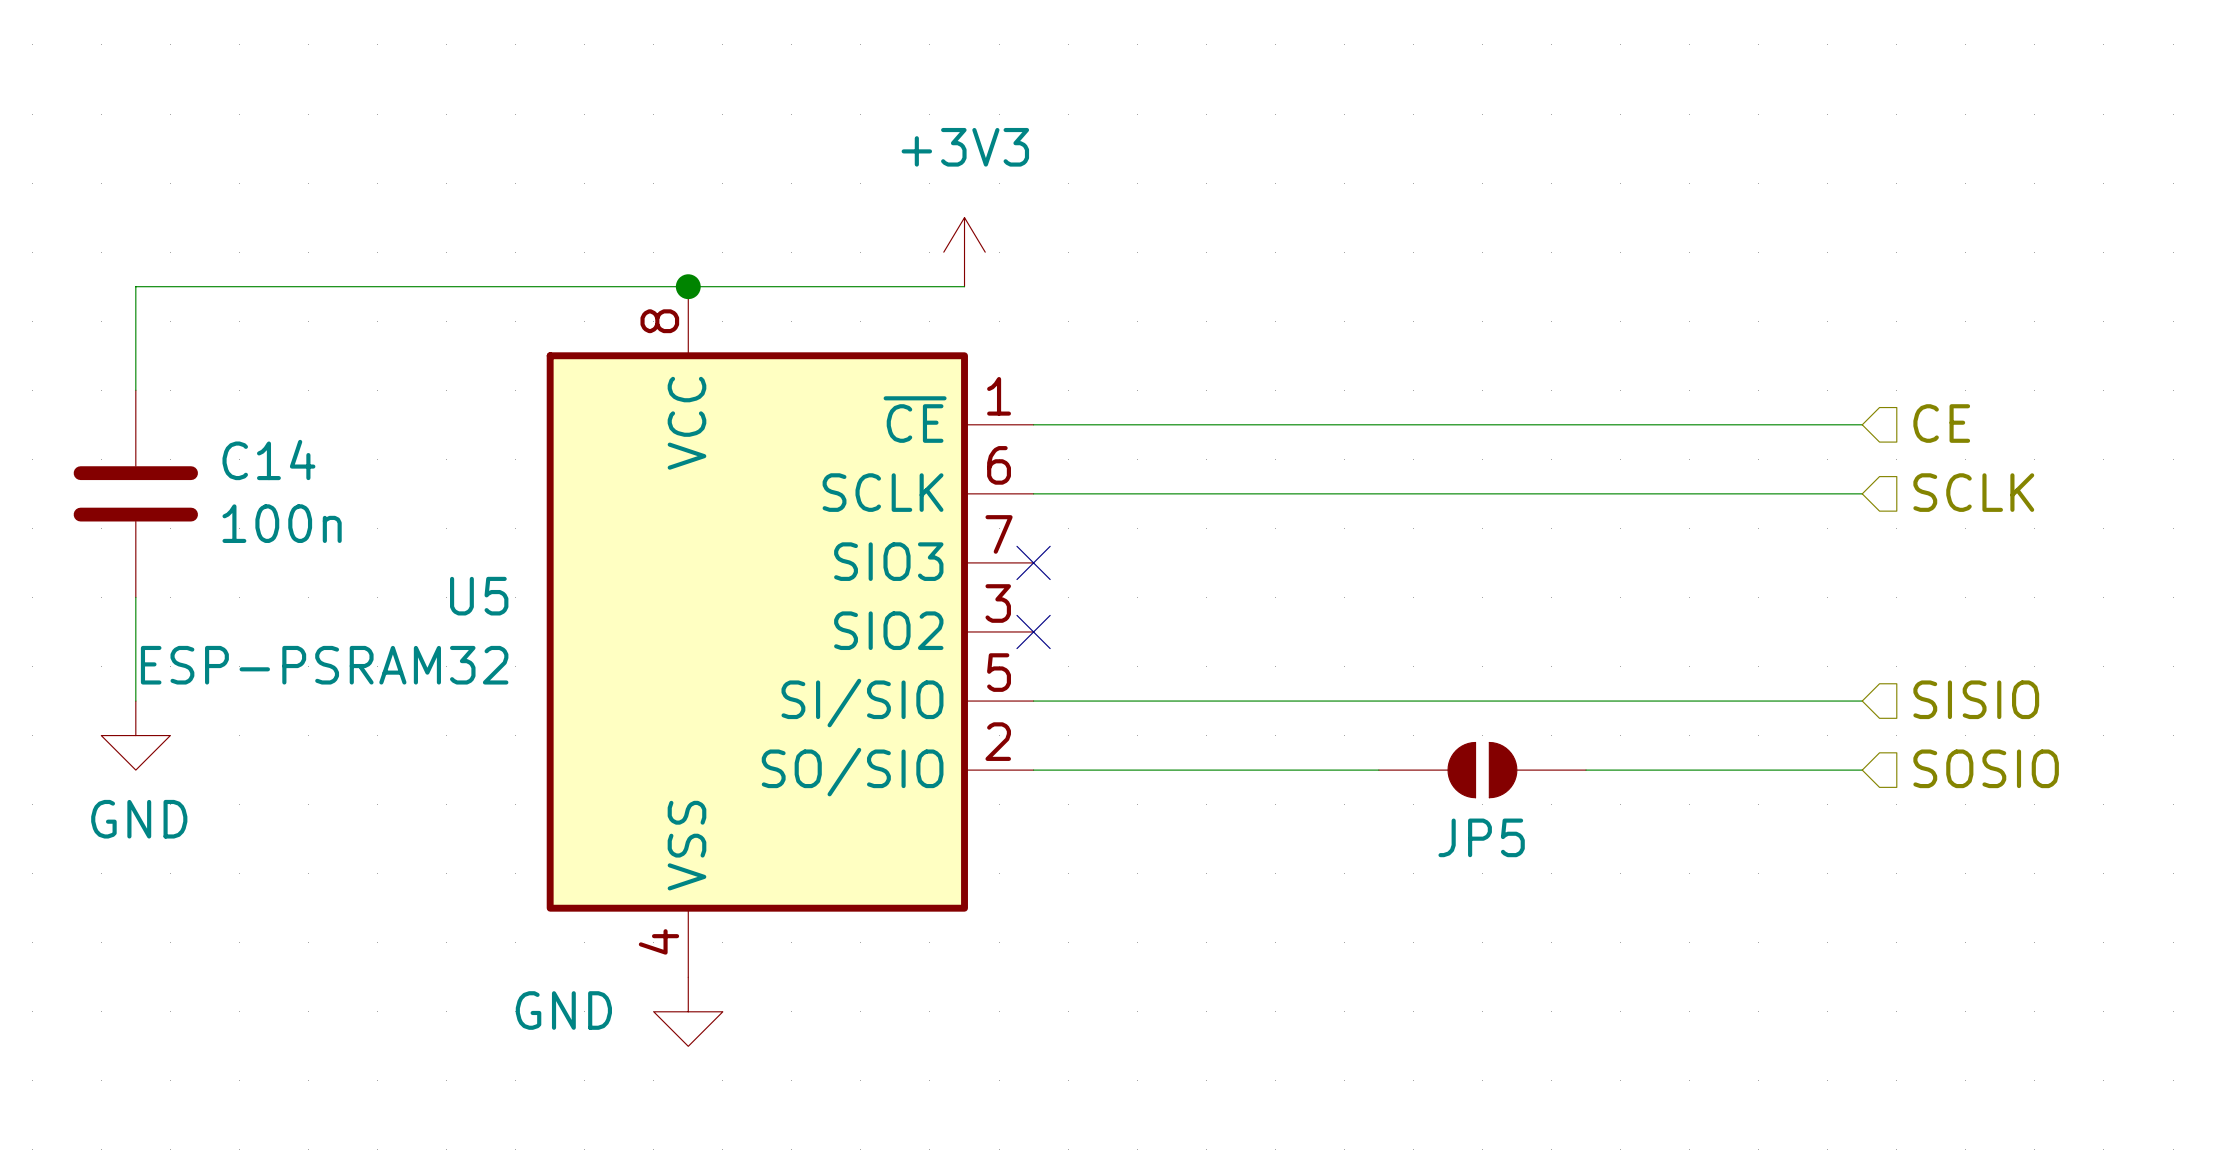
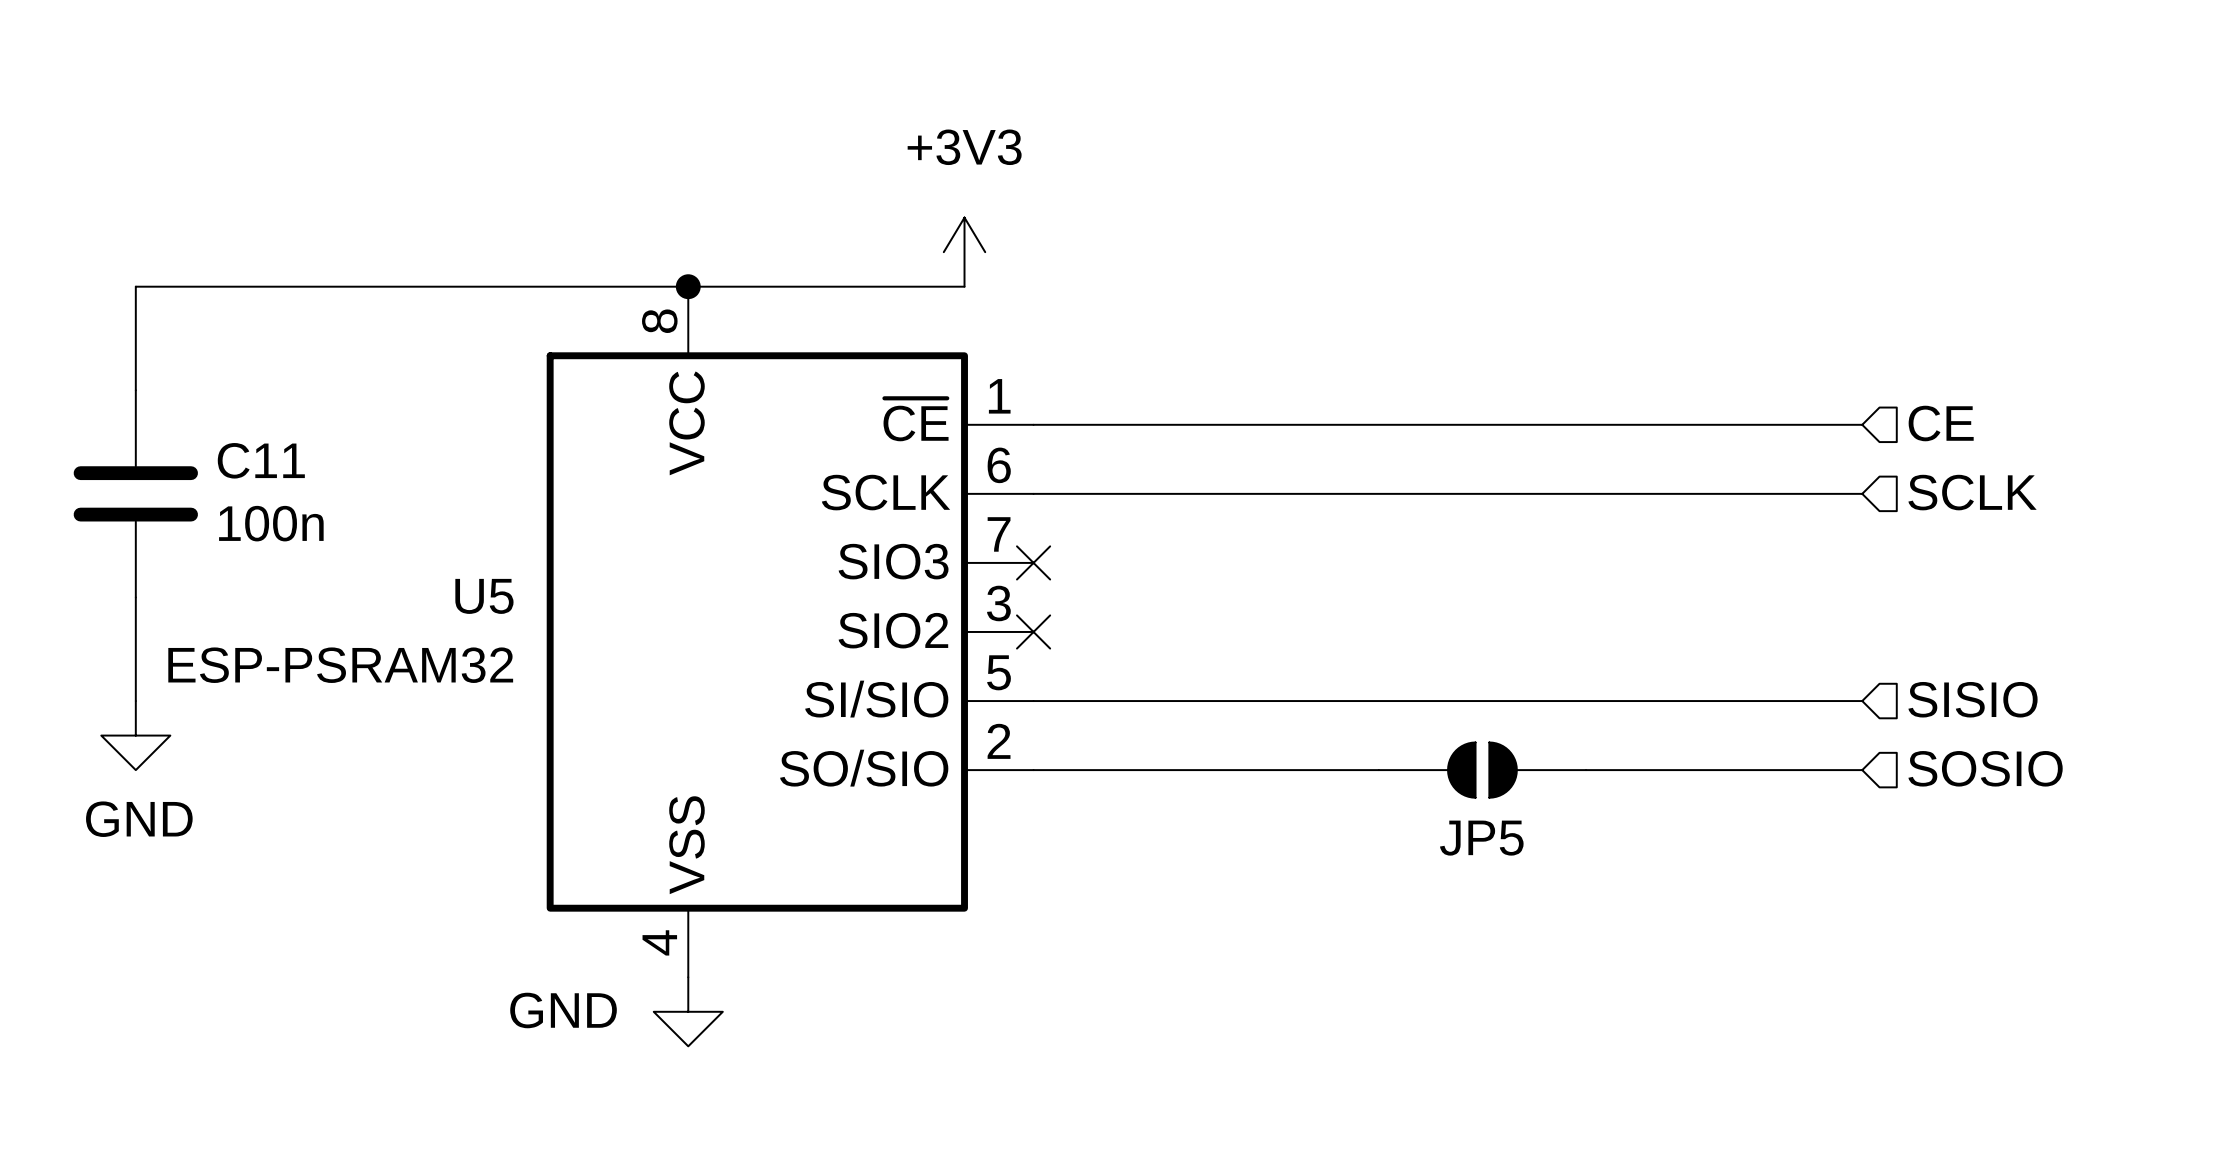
C14 name: C14 (268, 459) -> C11 (261, 460)

